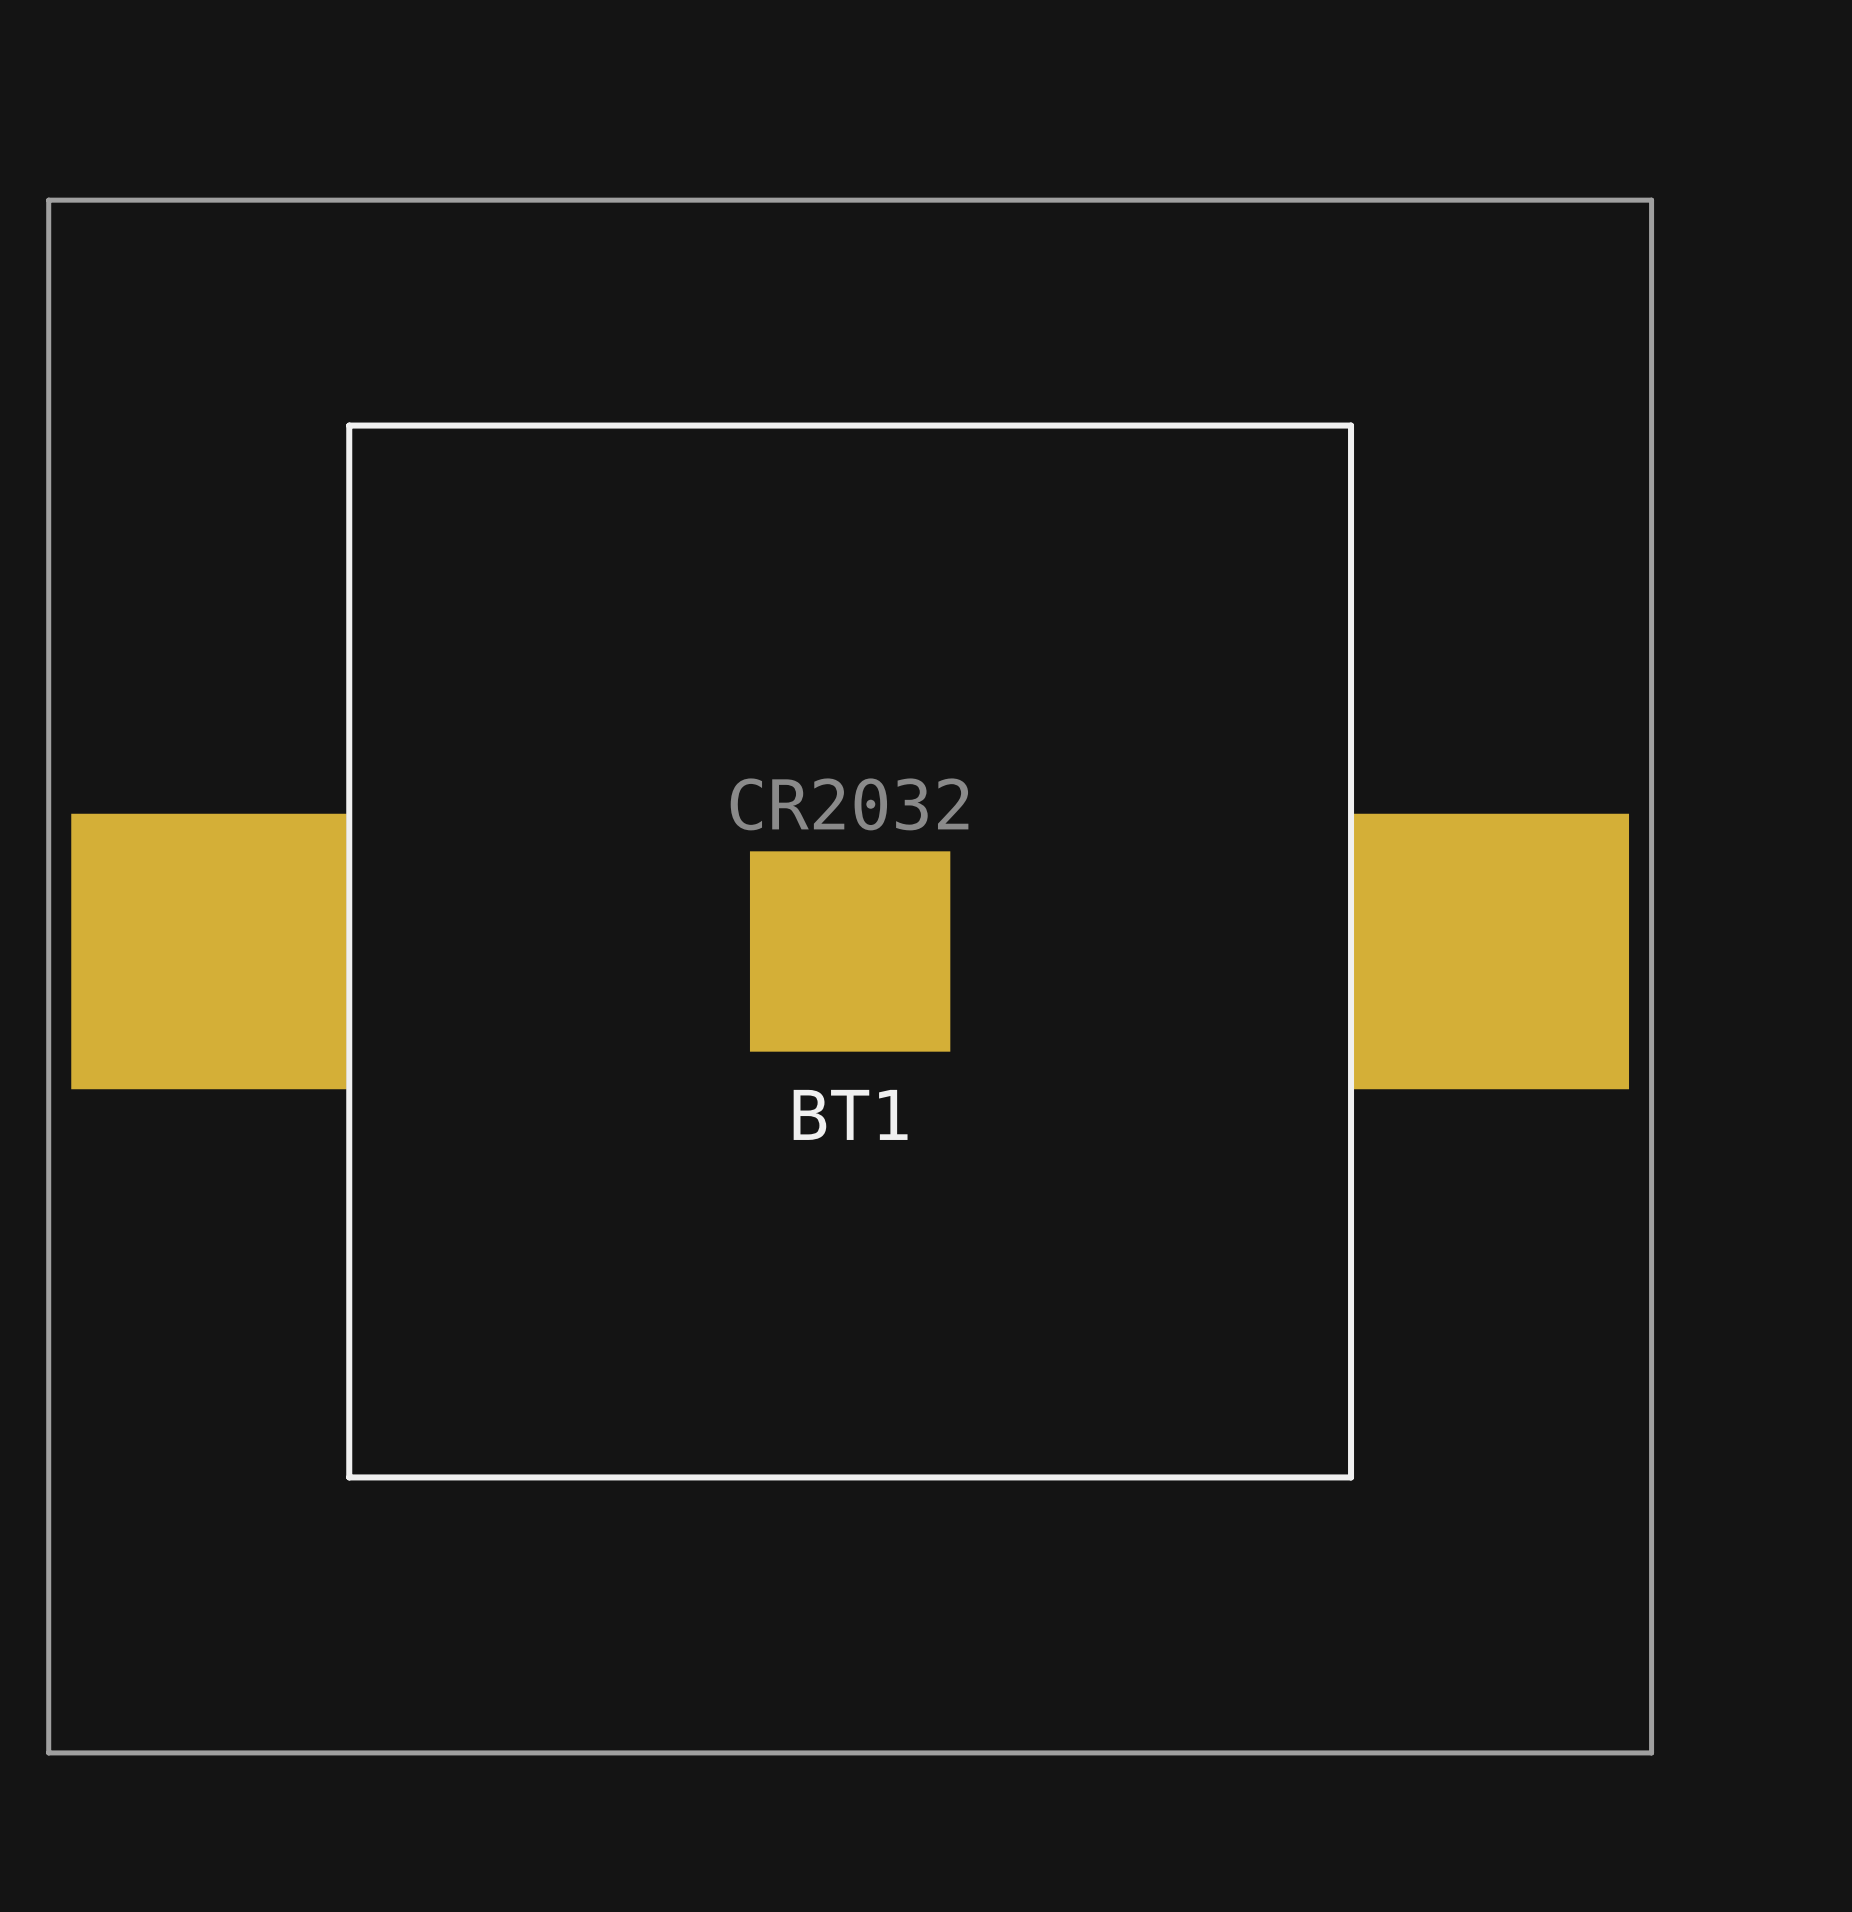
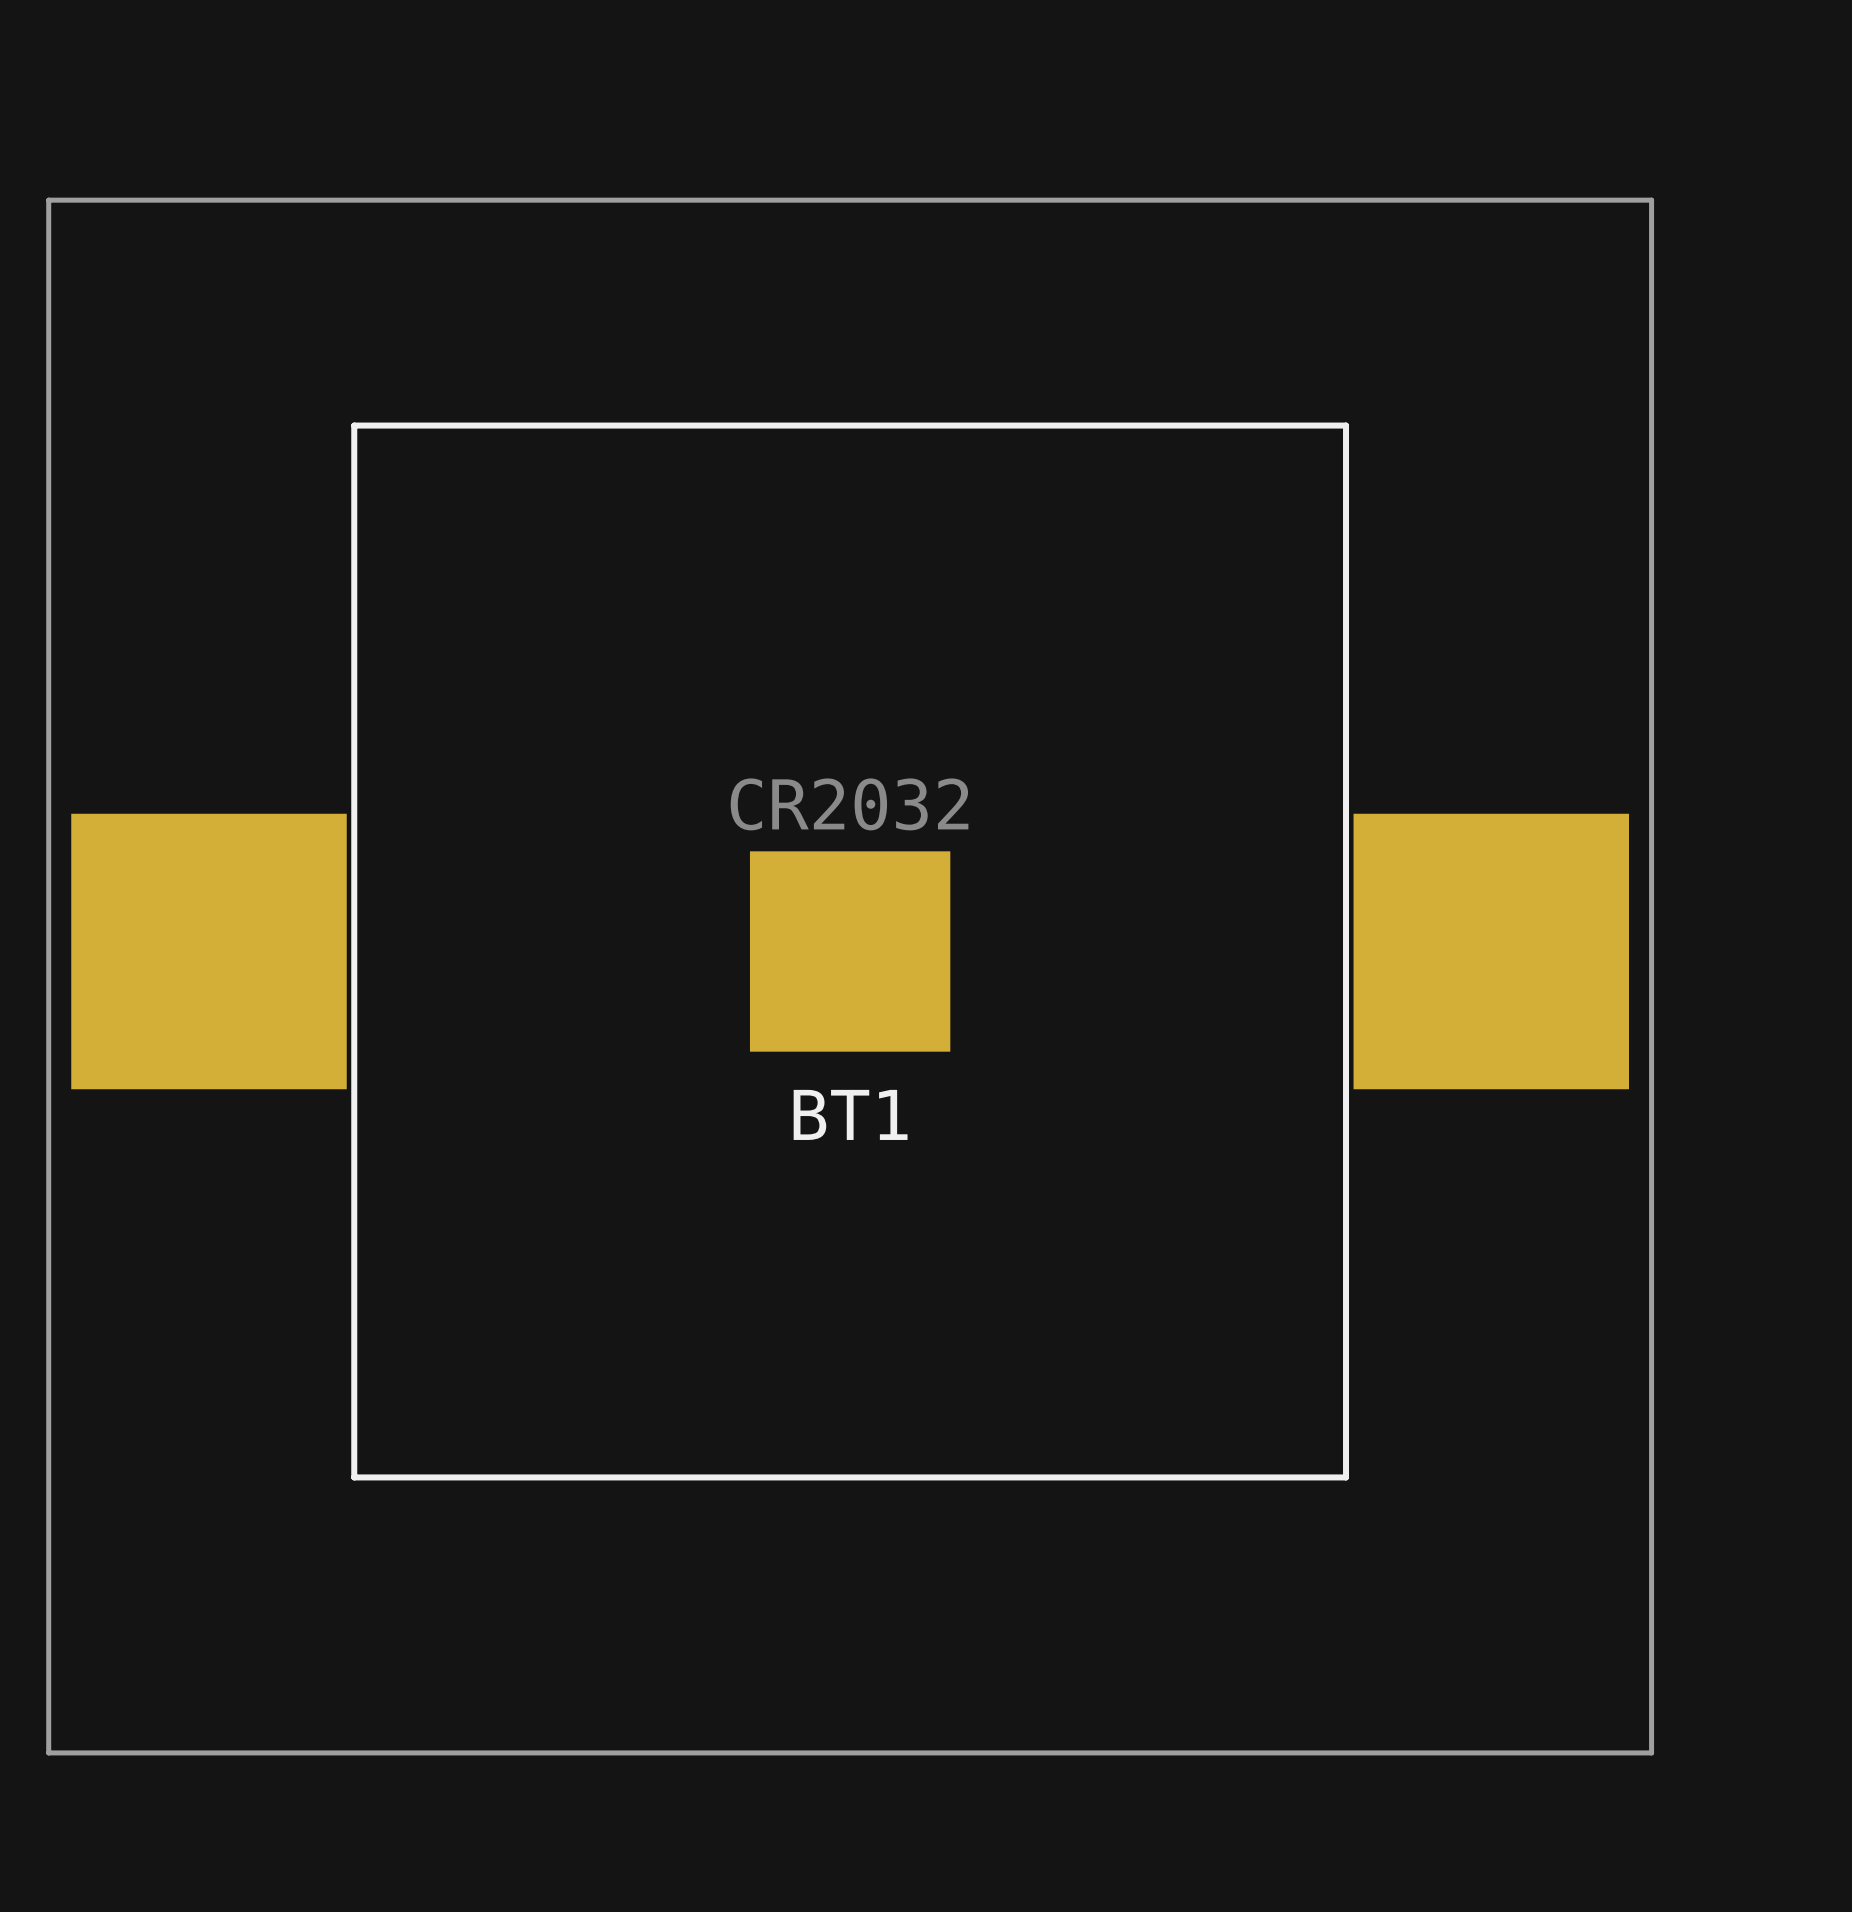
BT1 footprint: [71, 422, 1630, 1481] -> [71, 422, 1630, 1481]

